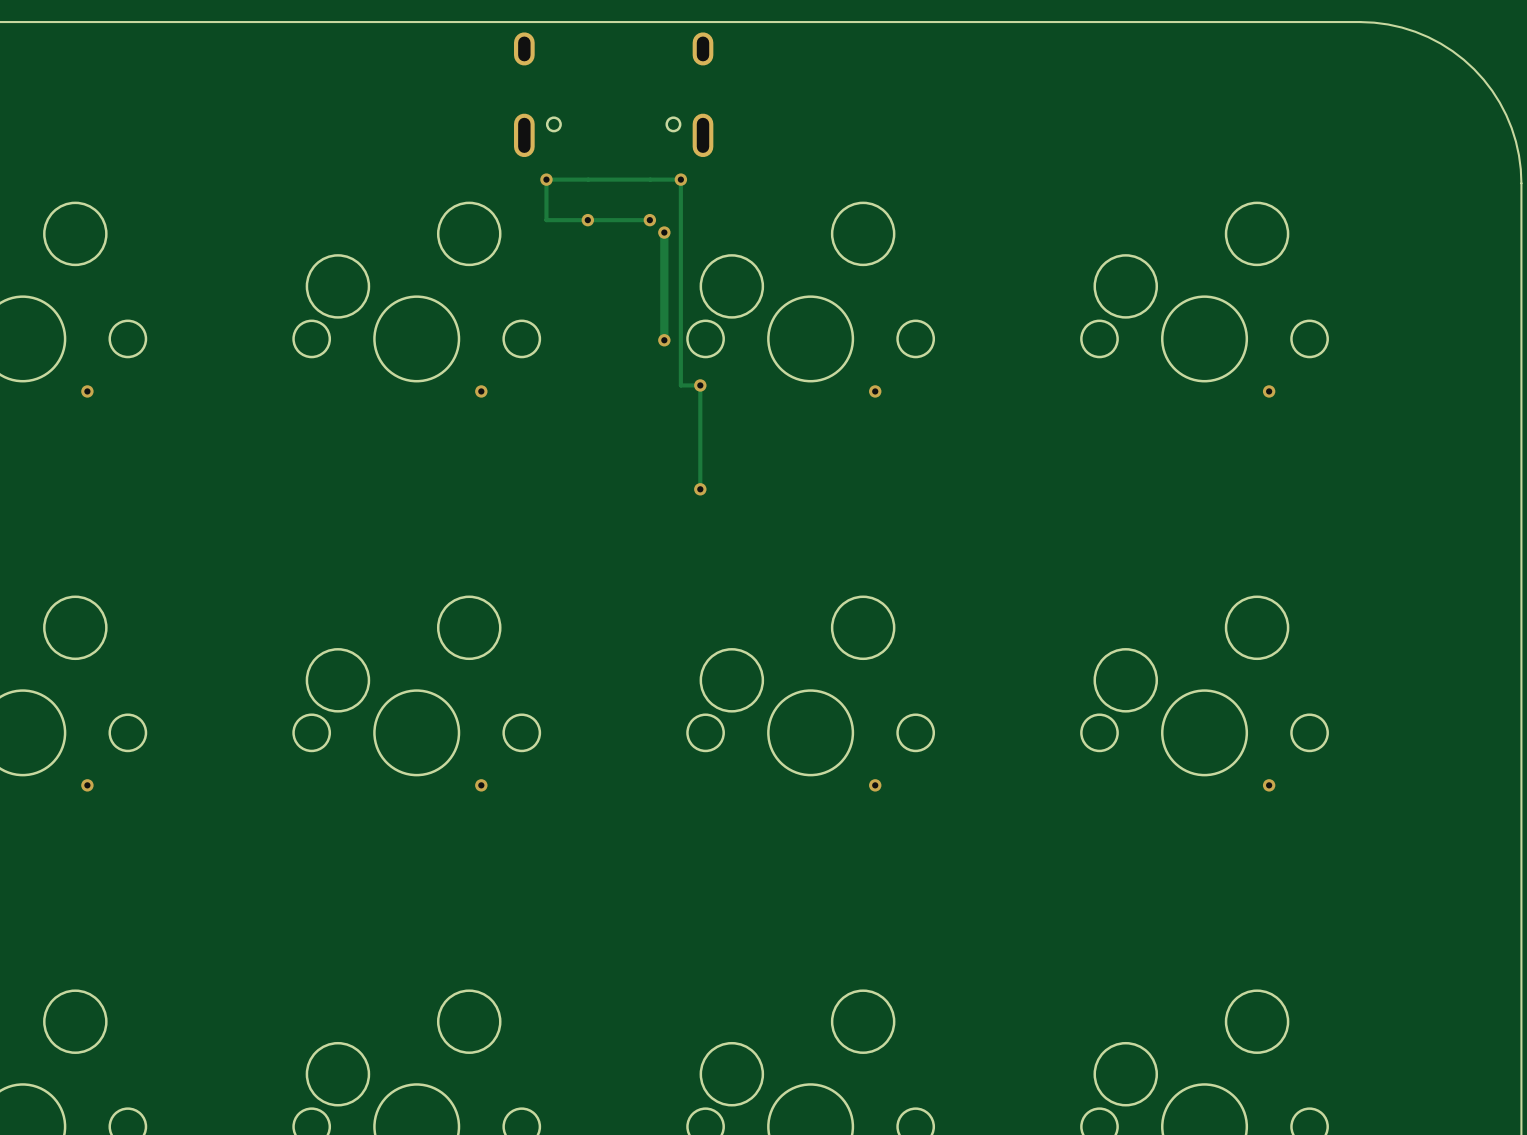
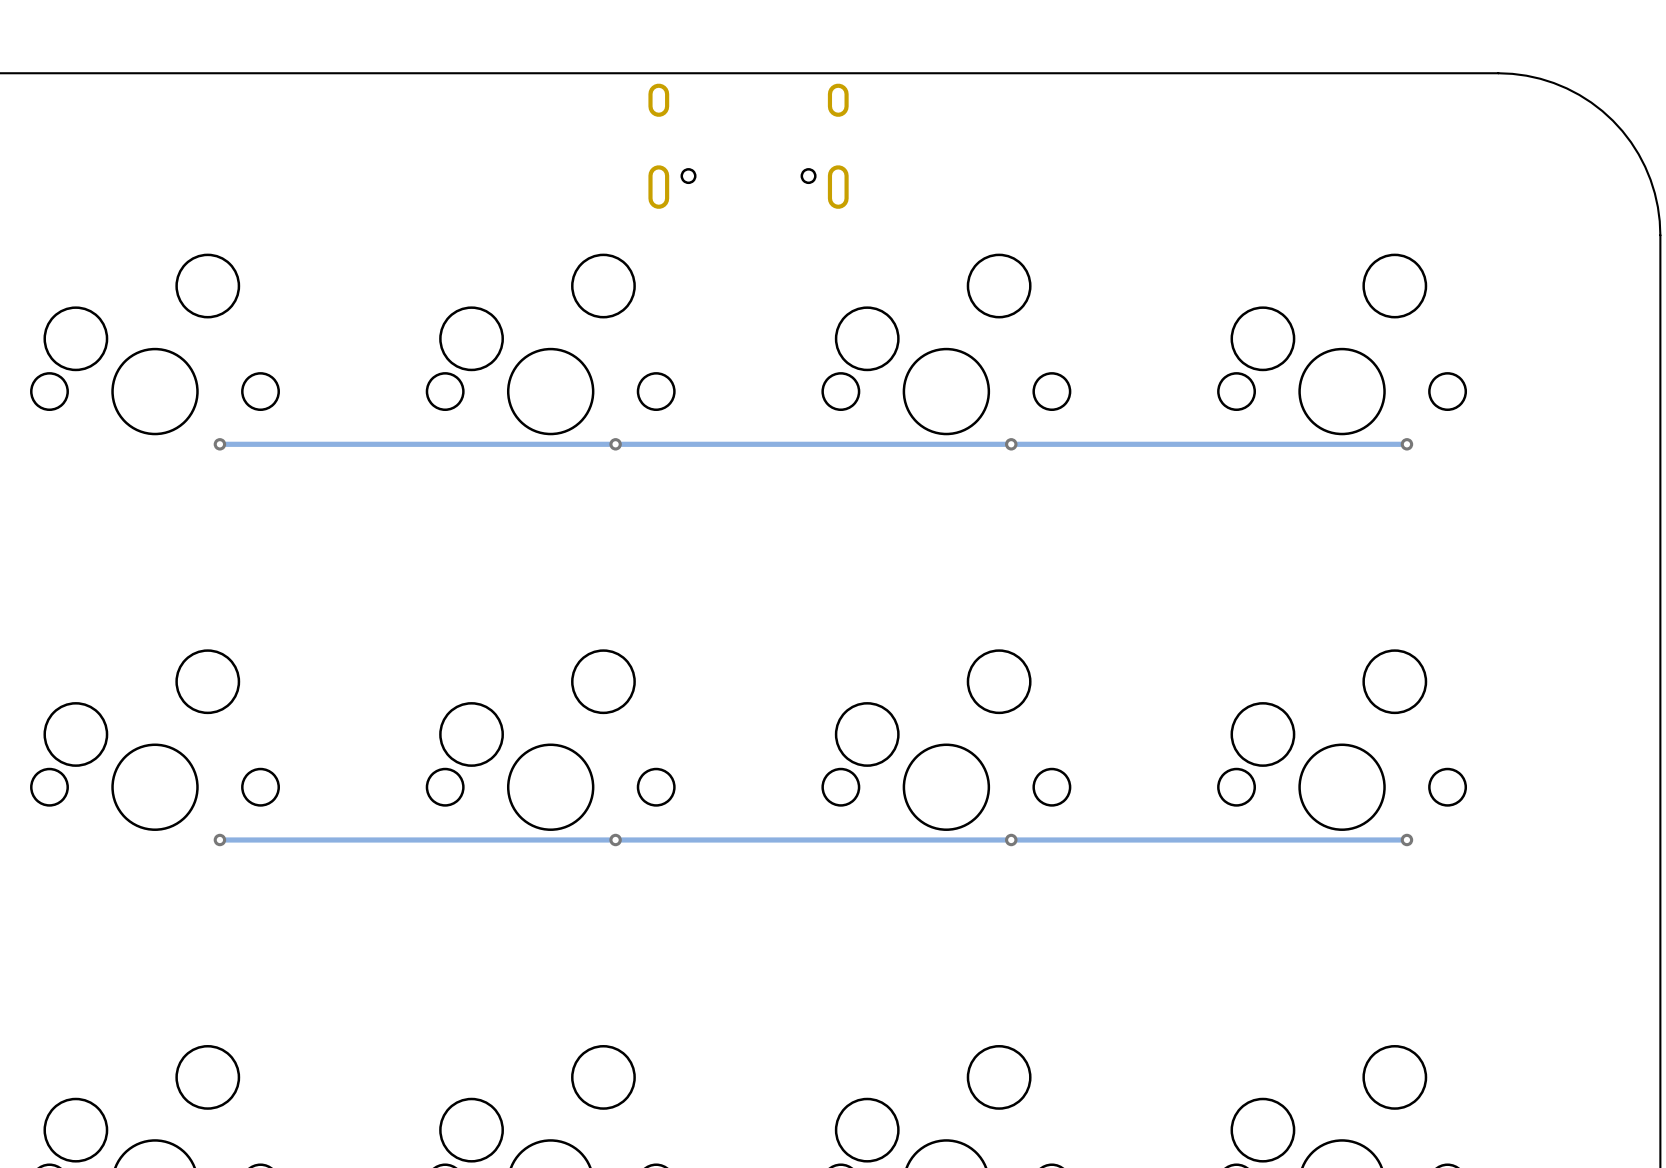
via: (546, 179) -> none
via: (680, 179) -> none
via: (587, 220) -> none
track: (649, 220) (546, 220) (546, 179) (680, 179) (680, 385) (700, 385) (700, 489) -> none
via: (649, 220) -> none
track: (664, 232) (664, 340) -> none
via: (664, 232) -> none
via: (664, 340) -> none
via: (700, 385) -> none
track: none -> (1406, 444) (219, 444)
via: (700, 489) -> none
track: none -> (1406, 839) (219, 839)

